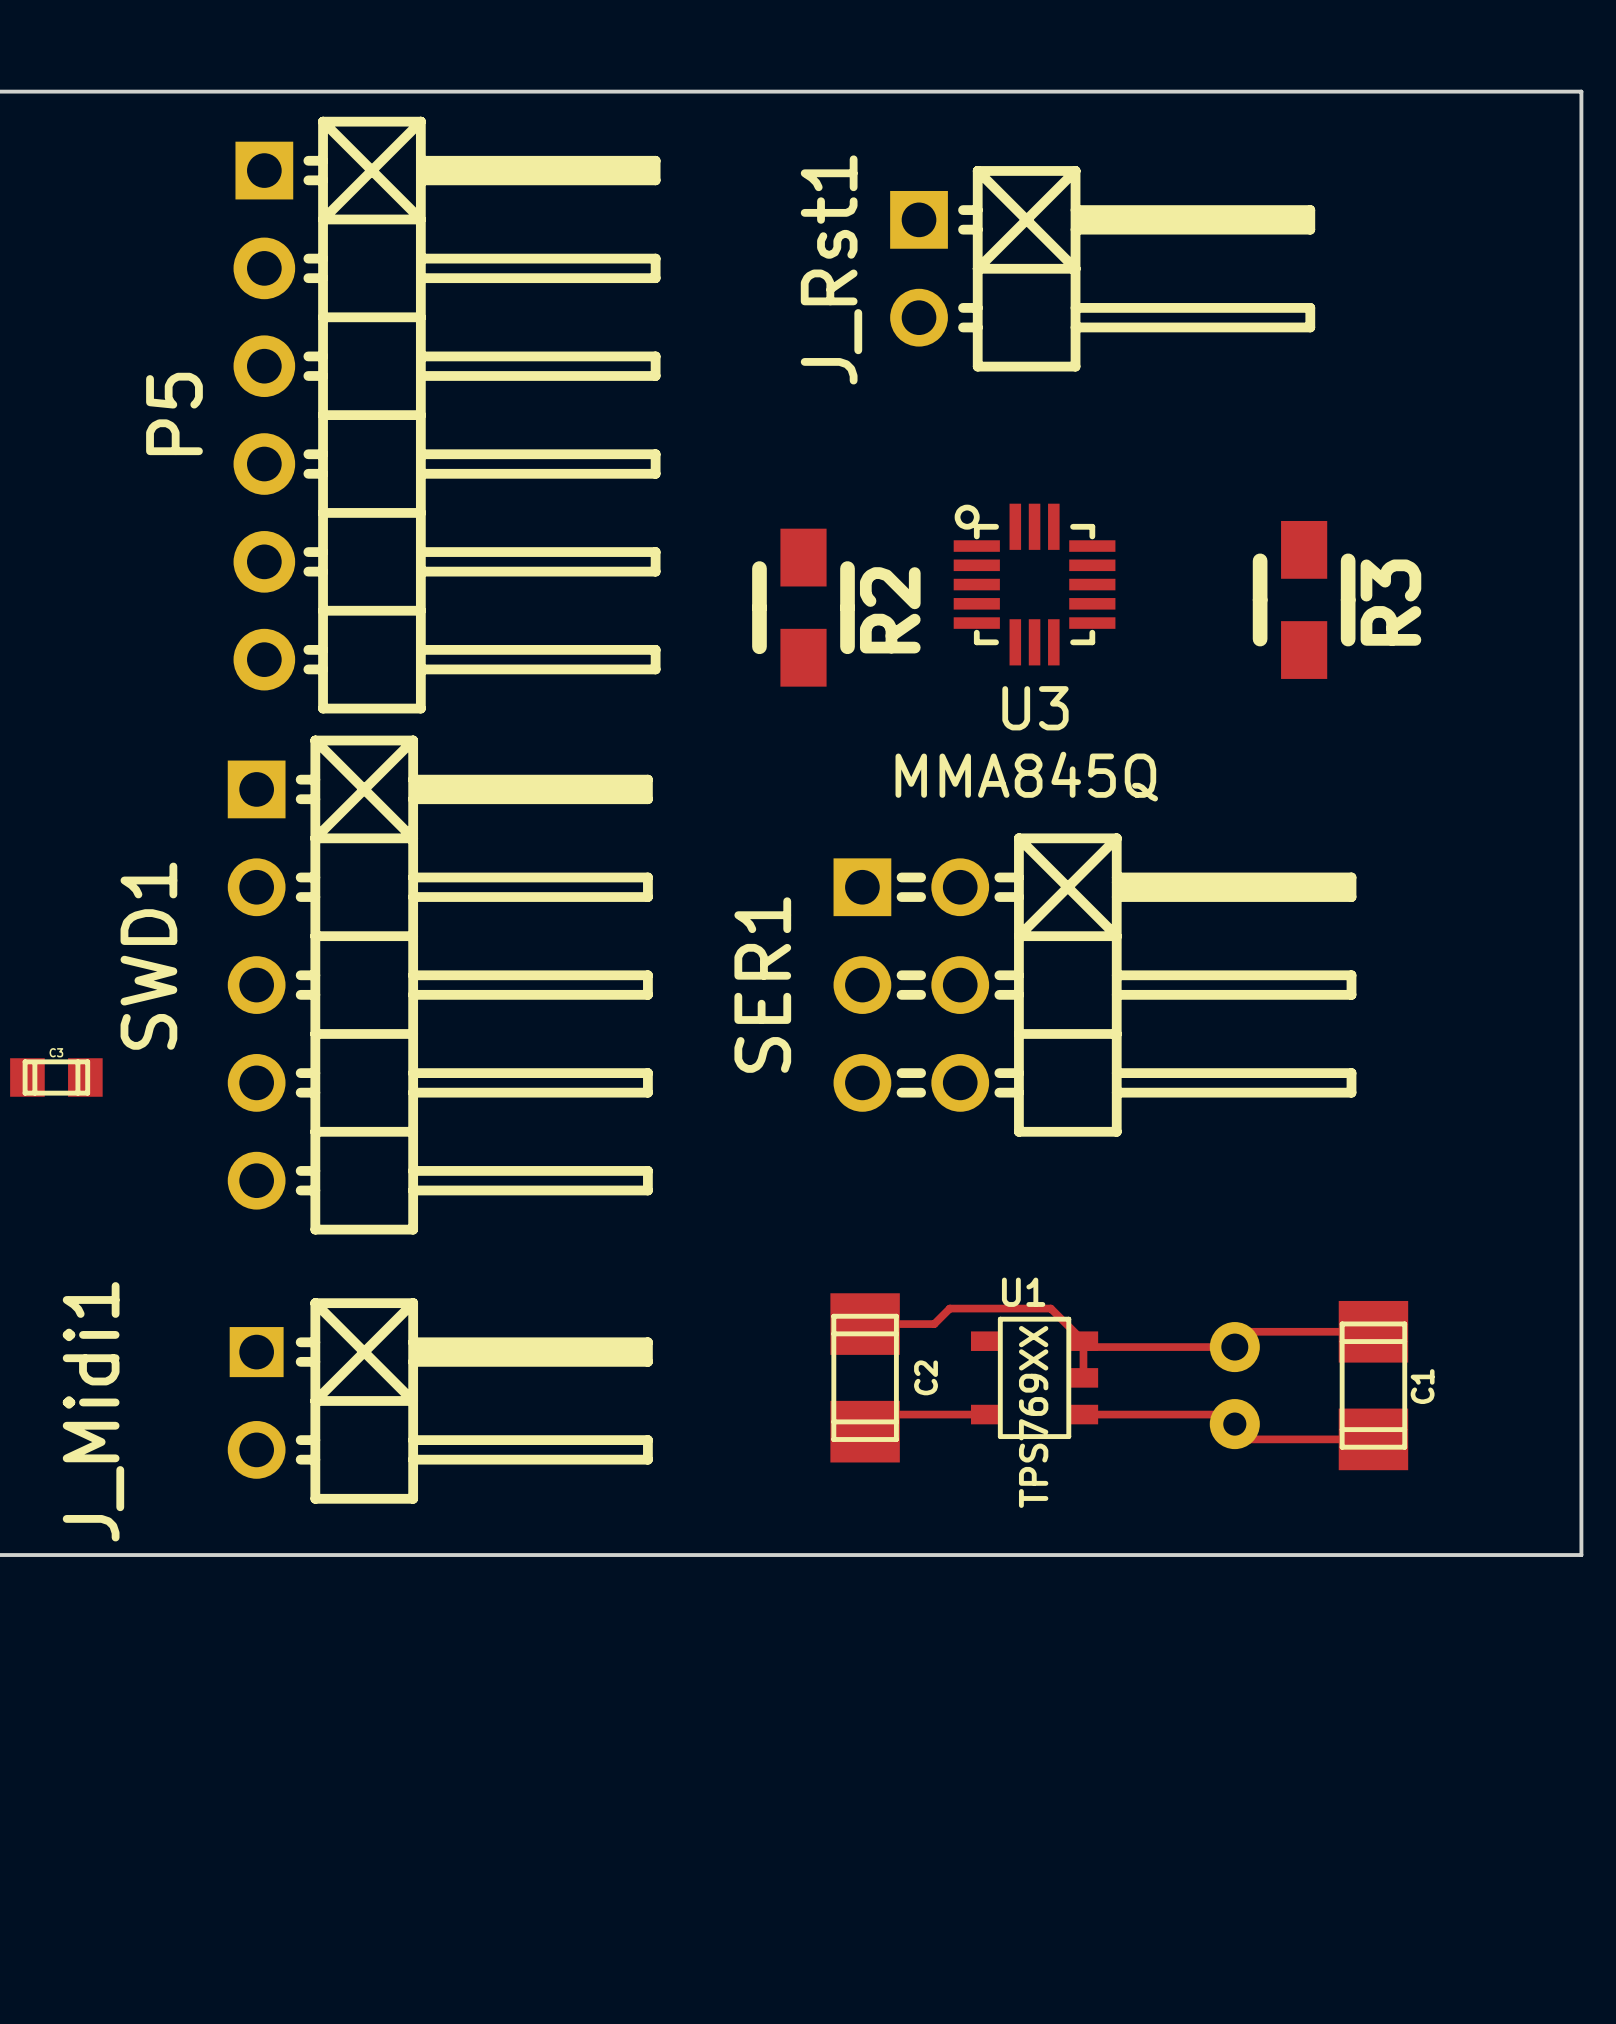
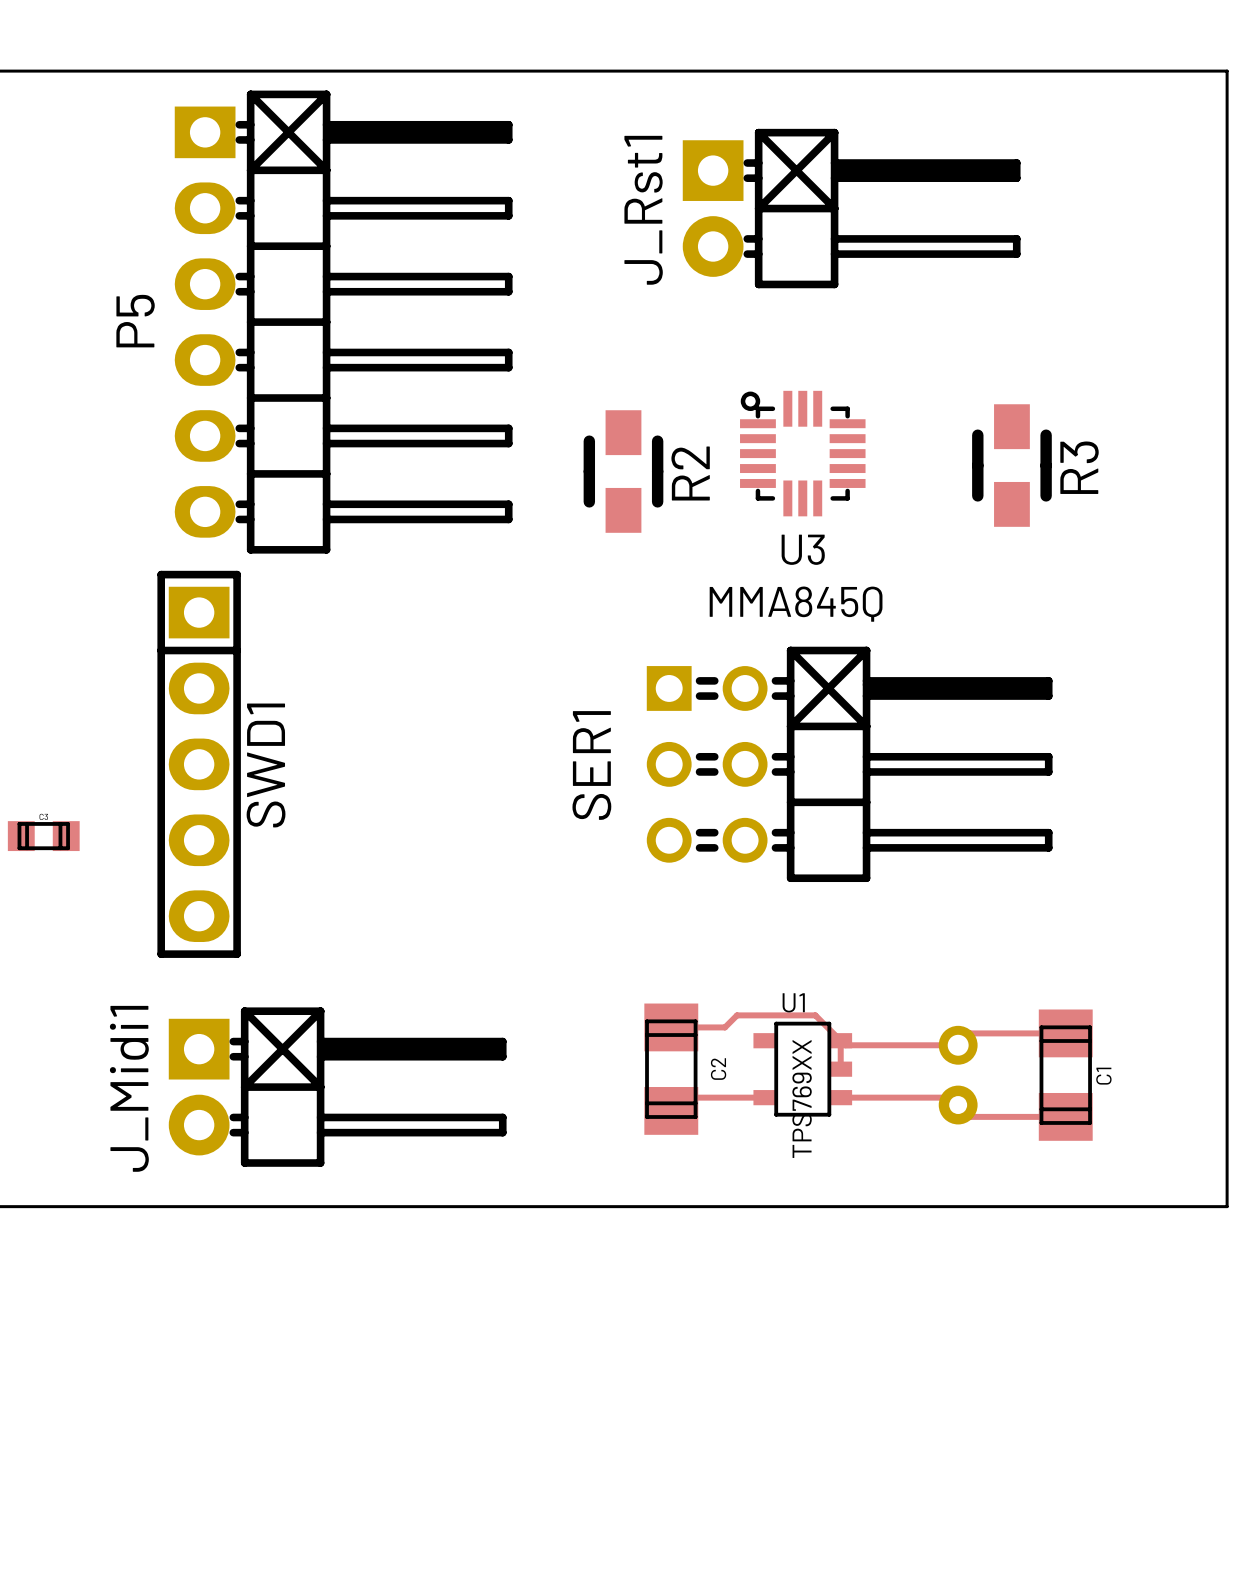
P5 footprint: [233, 116, 661, 714] -> [174, 90, 513, 554]
J_Rst1 footprint: [890, 166, 1316, 372] -> [682, 128, 1021, 289]
SWD1 footprint: [227, 735, 653, 1235] -> [157, 570, 241, 958]
SWD1 name position: SWD1 (148, 956) -> SWD1 (266, 765)
J_Midi1 footprint: [227, 1298, 653, 1504] -> [168, 1007, 507, 1167]
J_Midi1 name position: J_Midi1 (93, 1411) -> J_Midi1 (129, 1088)

